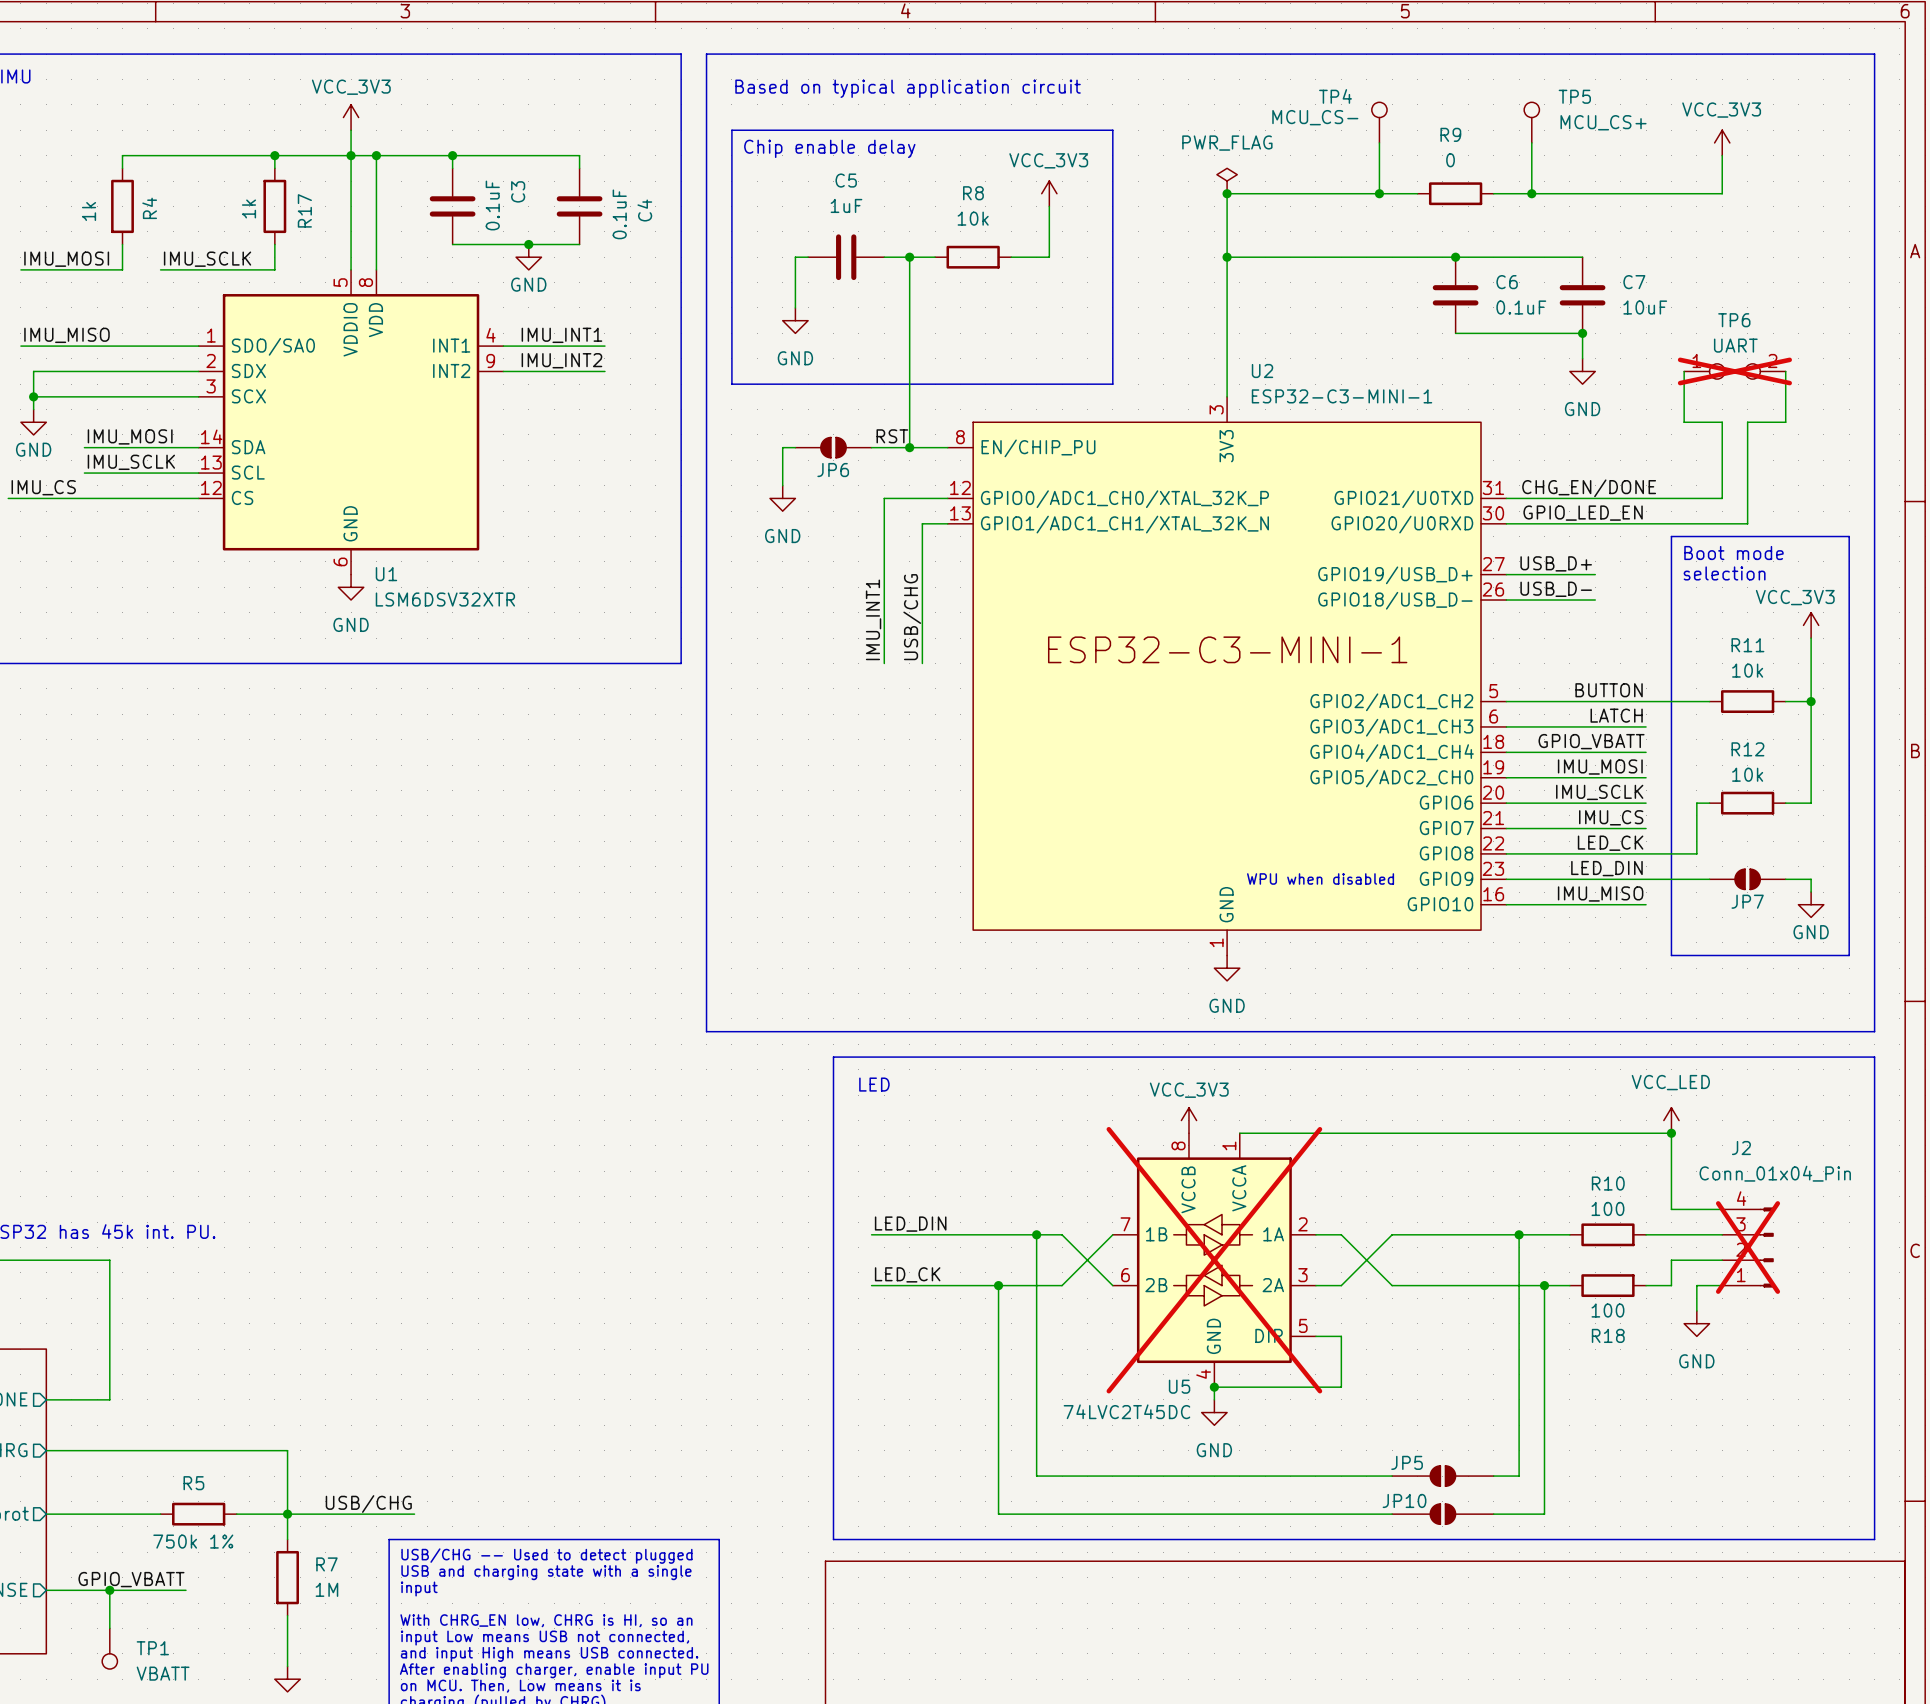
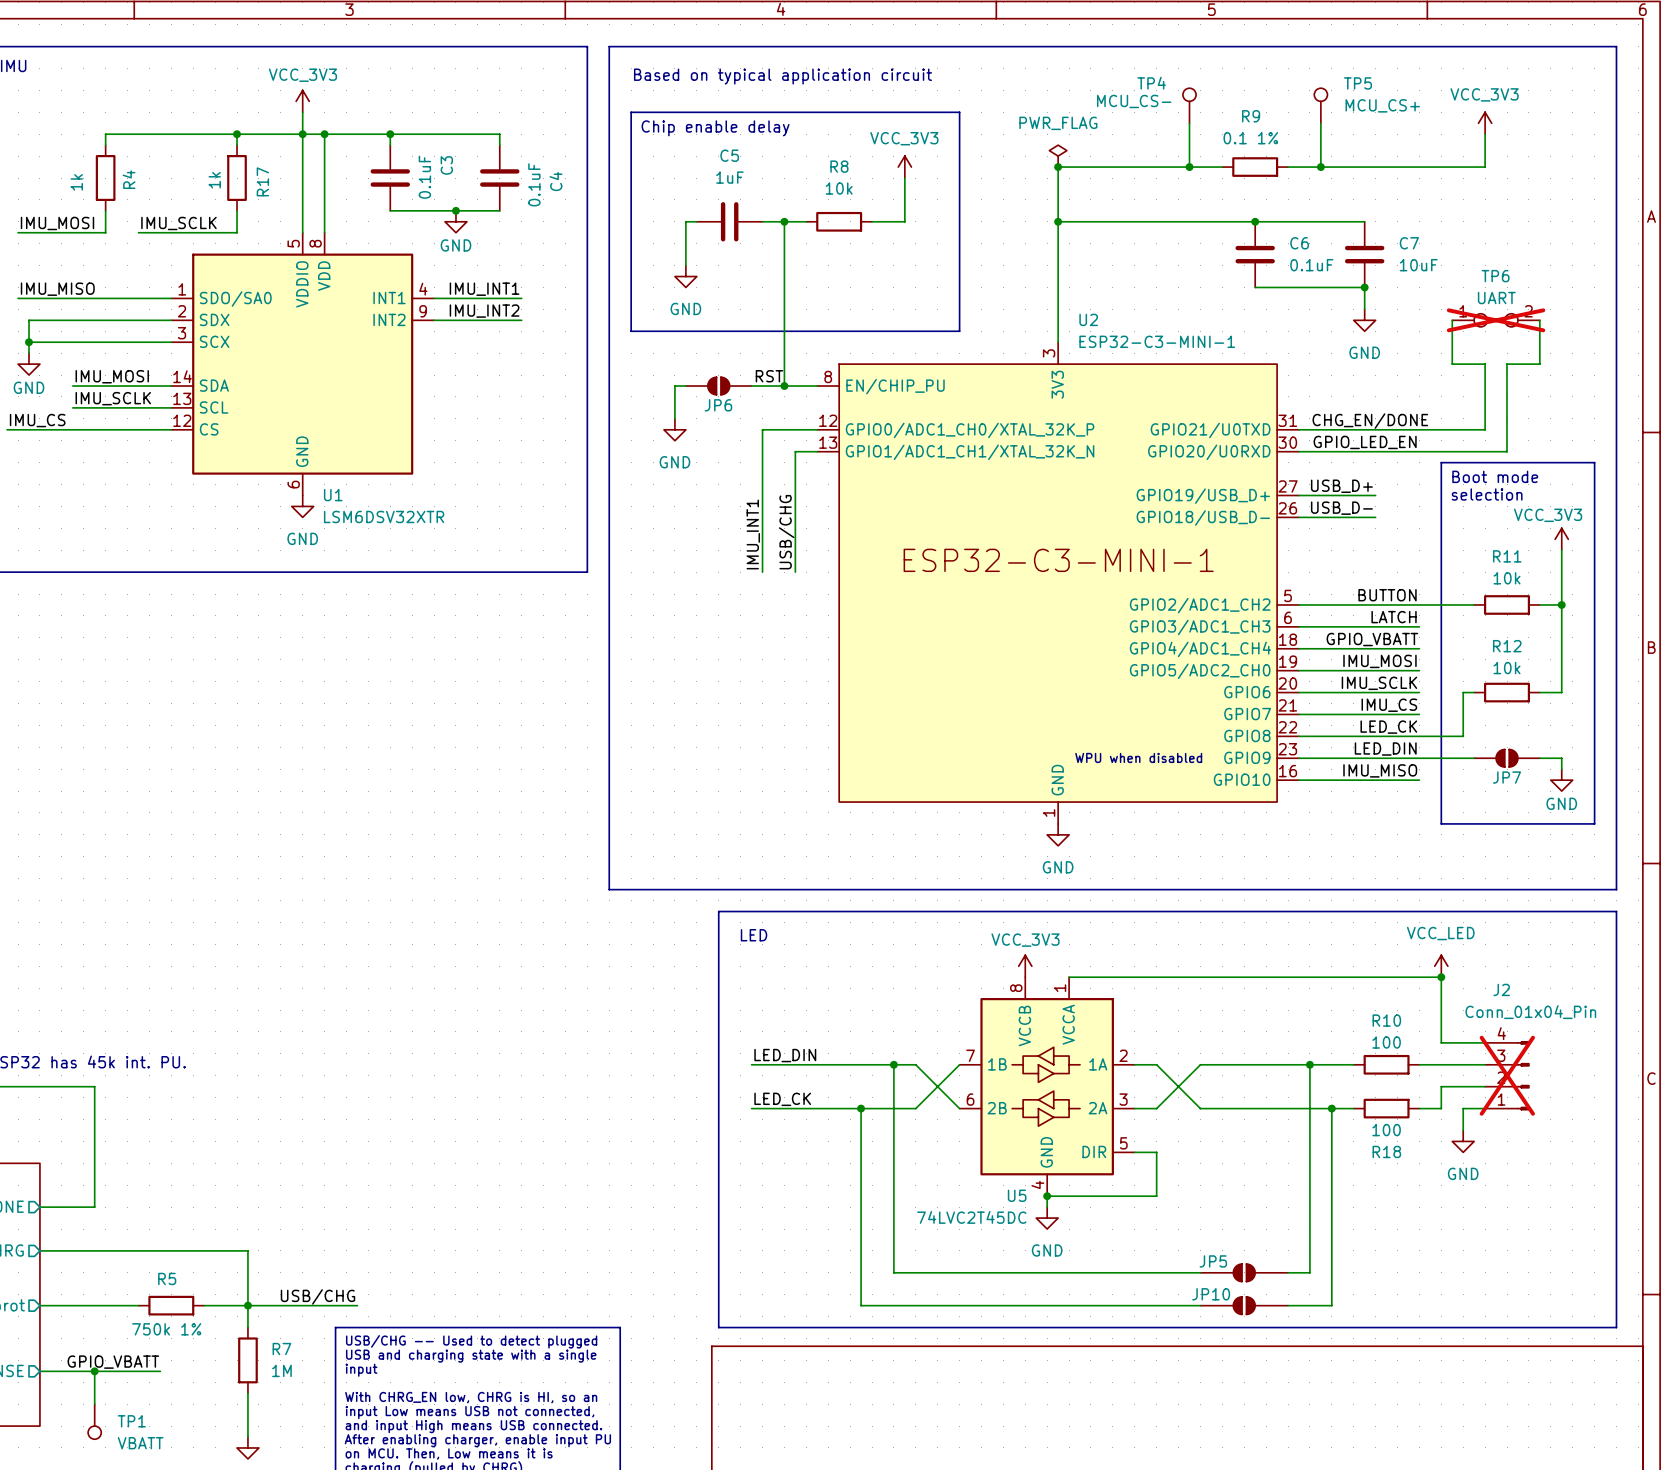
R9 value: 0 (1450, 160) -> 0.1 1% (1250, 138)
U5 do-not-place cross: (1214, 1260) -> none

